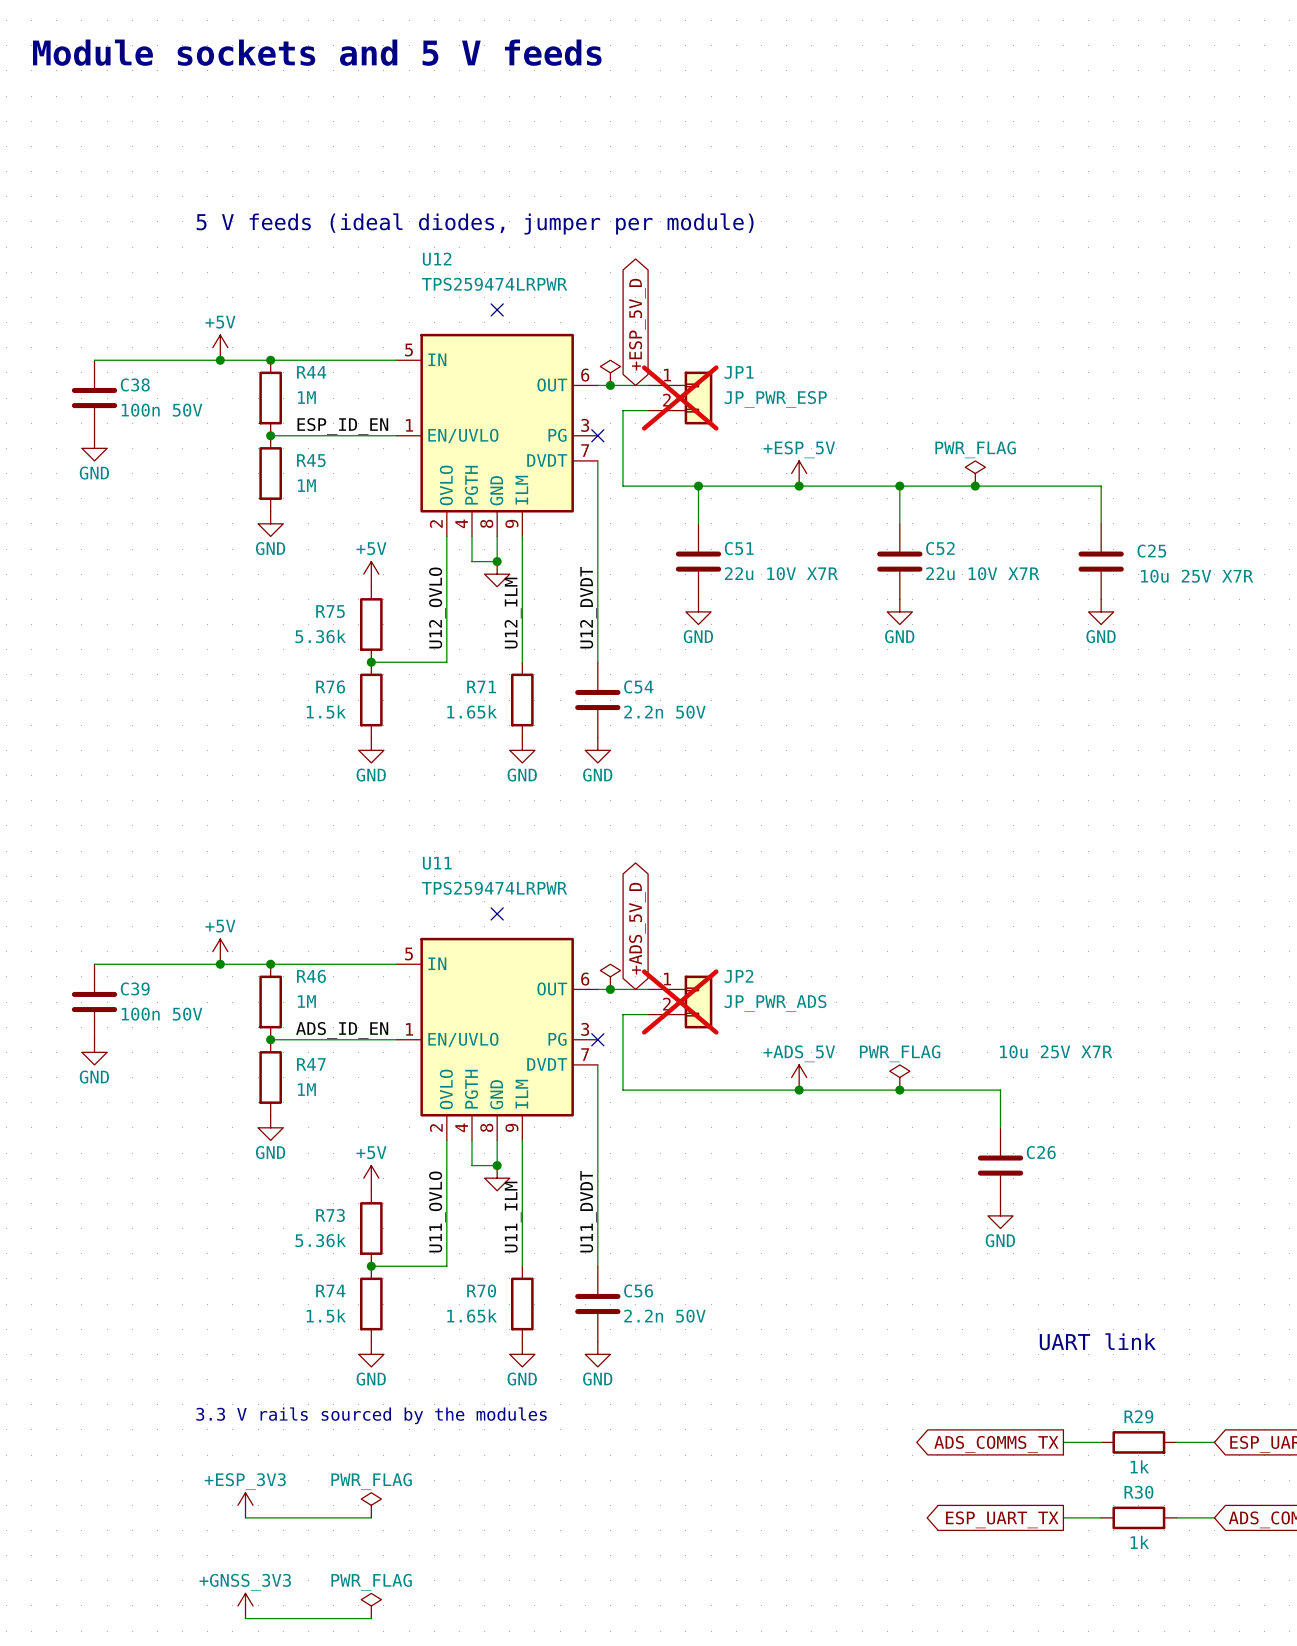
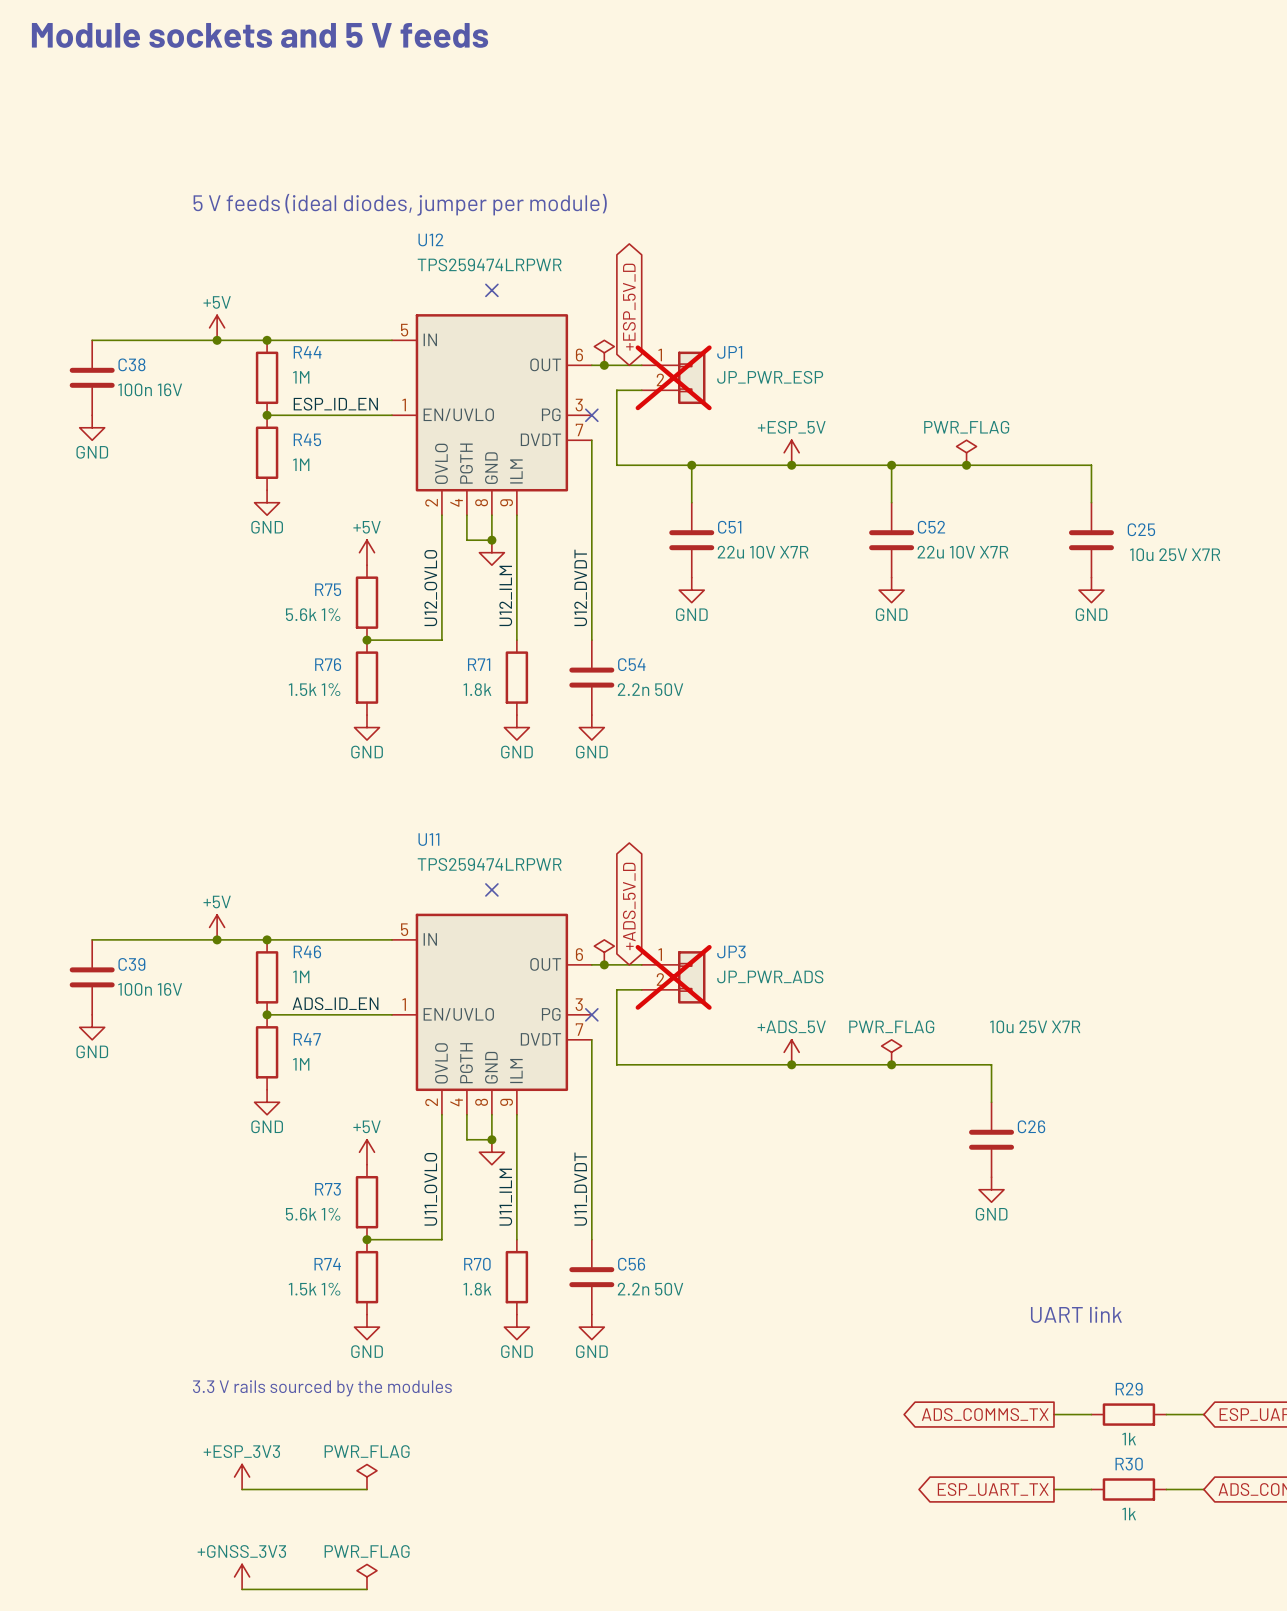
C38 value: 100n 50V (162, 410) -> 100n 16V (150, 389)
R75 value: 5.36k (320, 636) -> 5.6k 1% (313, 614)
R76 value: 1.5k (326, 711) -> 1.5k 1% (314, 689)
R71 value: 1.65k (472, 711) -> 1.8k (477, 689)
JP2 name: JP2 (738, 976) -> JP3 (731, 951)
C39 value: 100n 50V (162, 1014) -> 100n 16V (150, 989)
R73 value: 5.36k (320, 1240) -> 5.6k 1% (313, 1214)
R74 value: 1.5k (326, 1315) -> 1.5k 1% (314, 1289)
R70 value: 1.65k (472, 1315) -> 1.8k (477, 1289)

